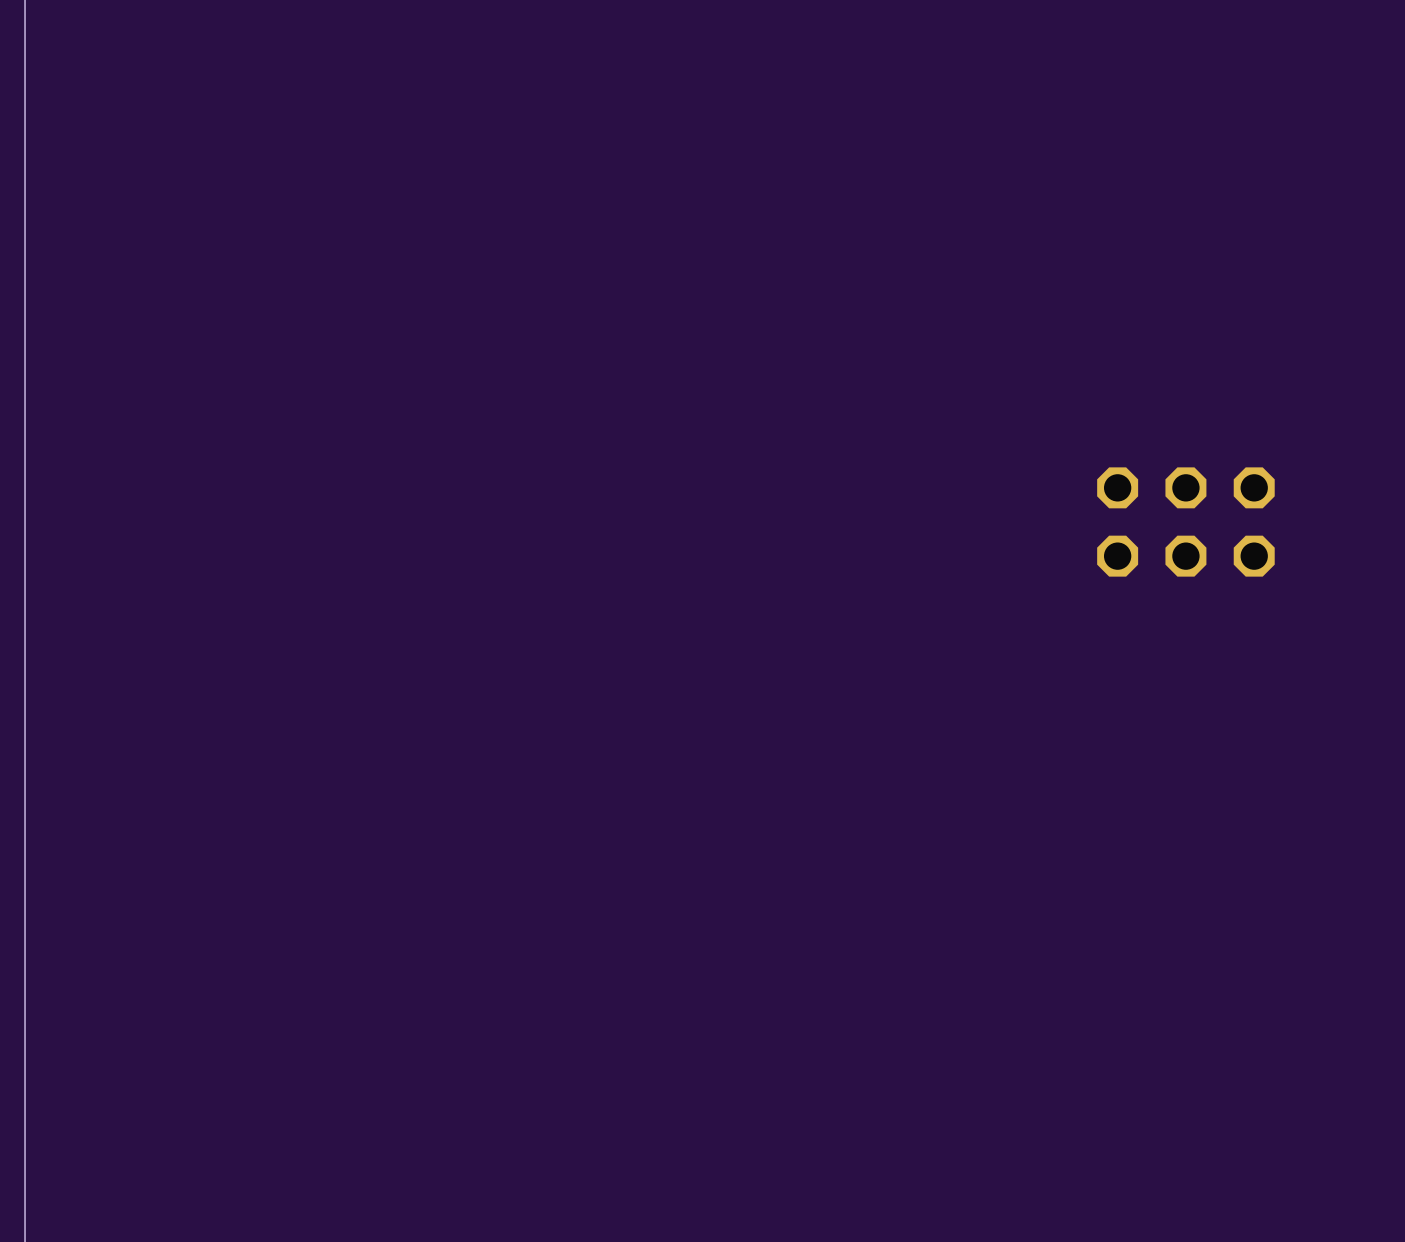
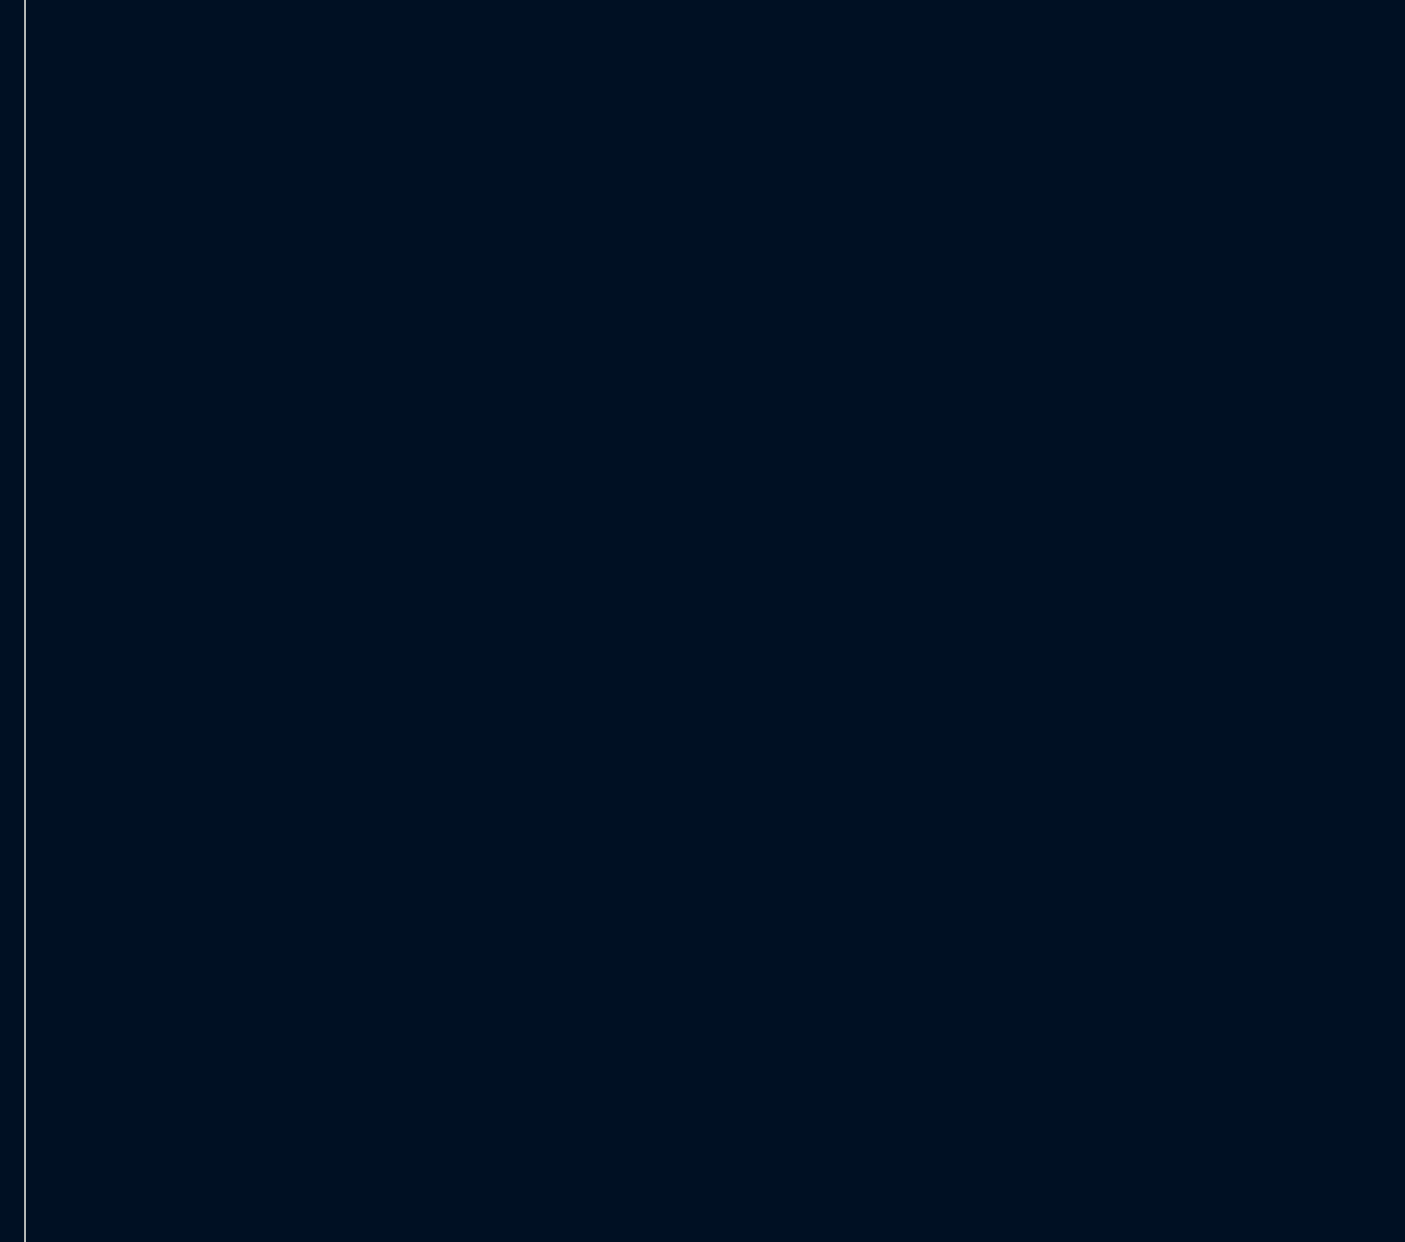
part: (1185, 522) -> none

